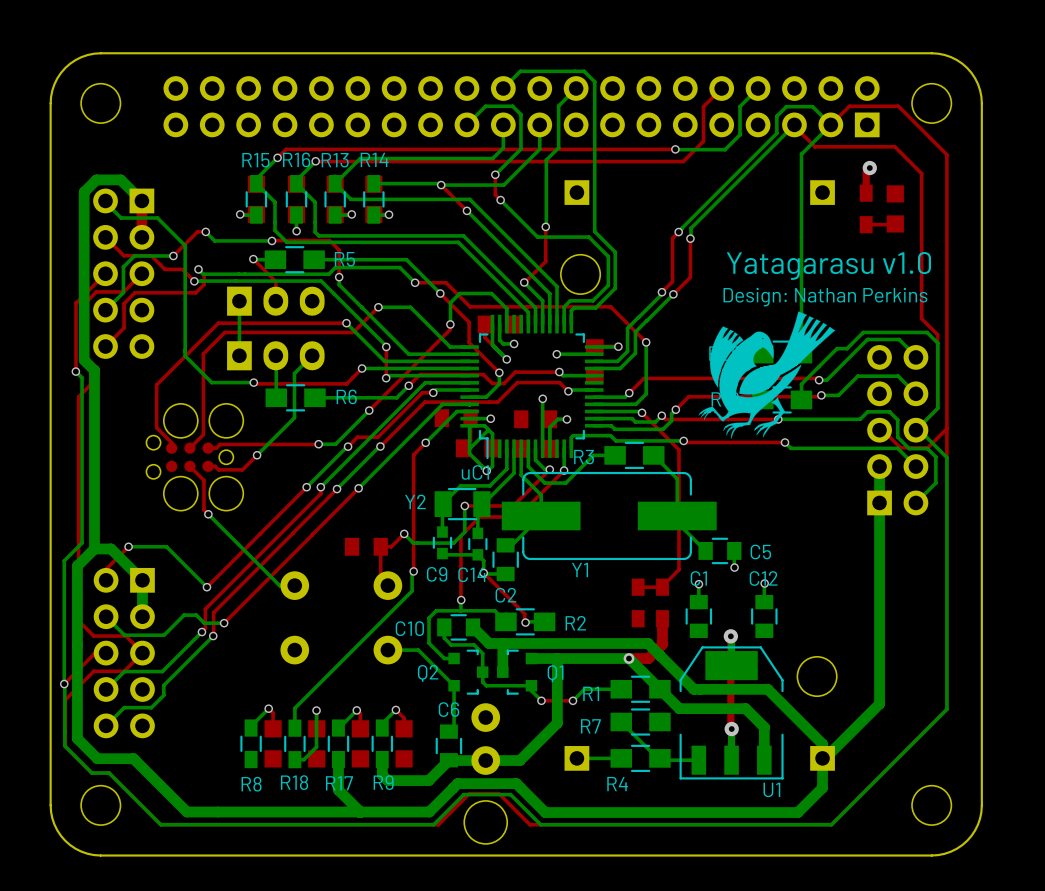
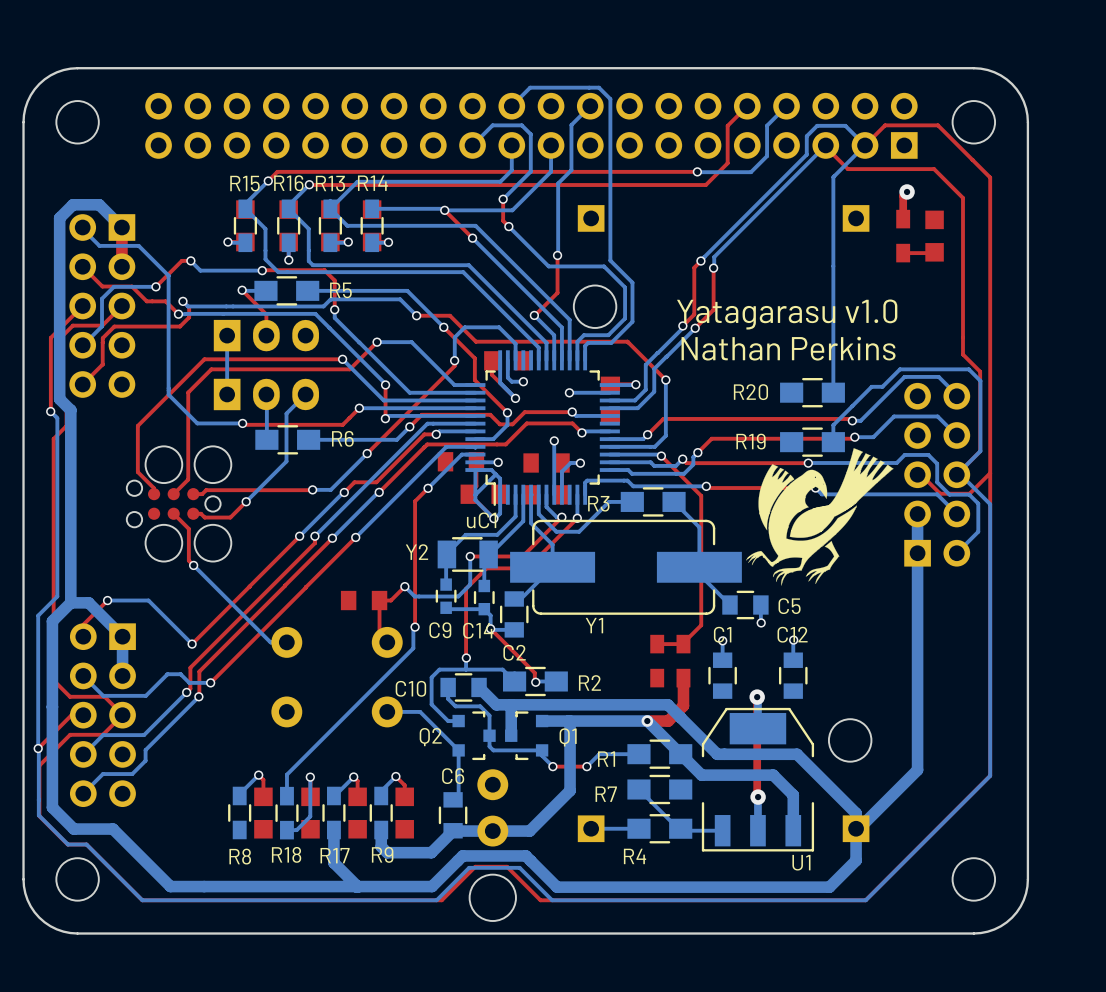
text position: Yatagarasu v1.0 (828, 265) -> Yatagarasu v1.0 (787, 314)
text: Design: Nathan Perkins (825, 297) -> Nathan Perkins (788, 348)
drawing position: (766, 375) -> (819, 516)

